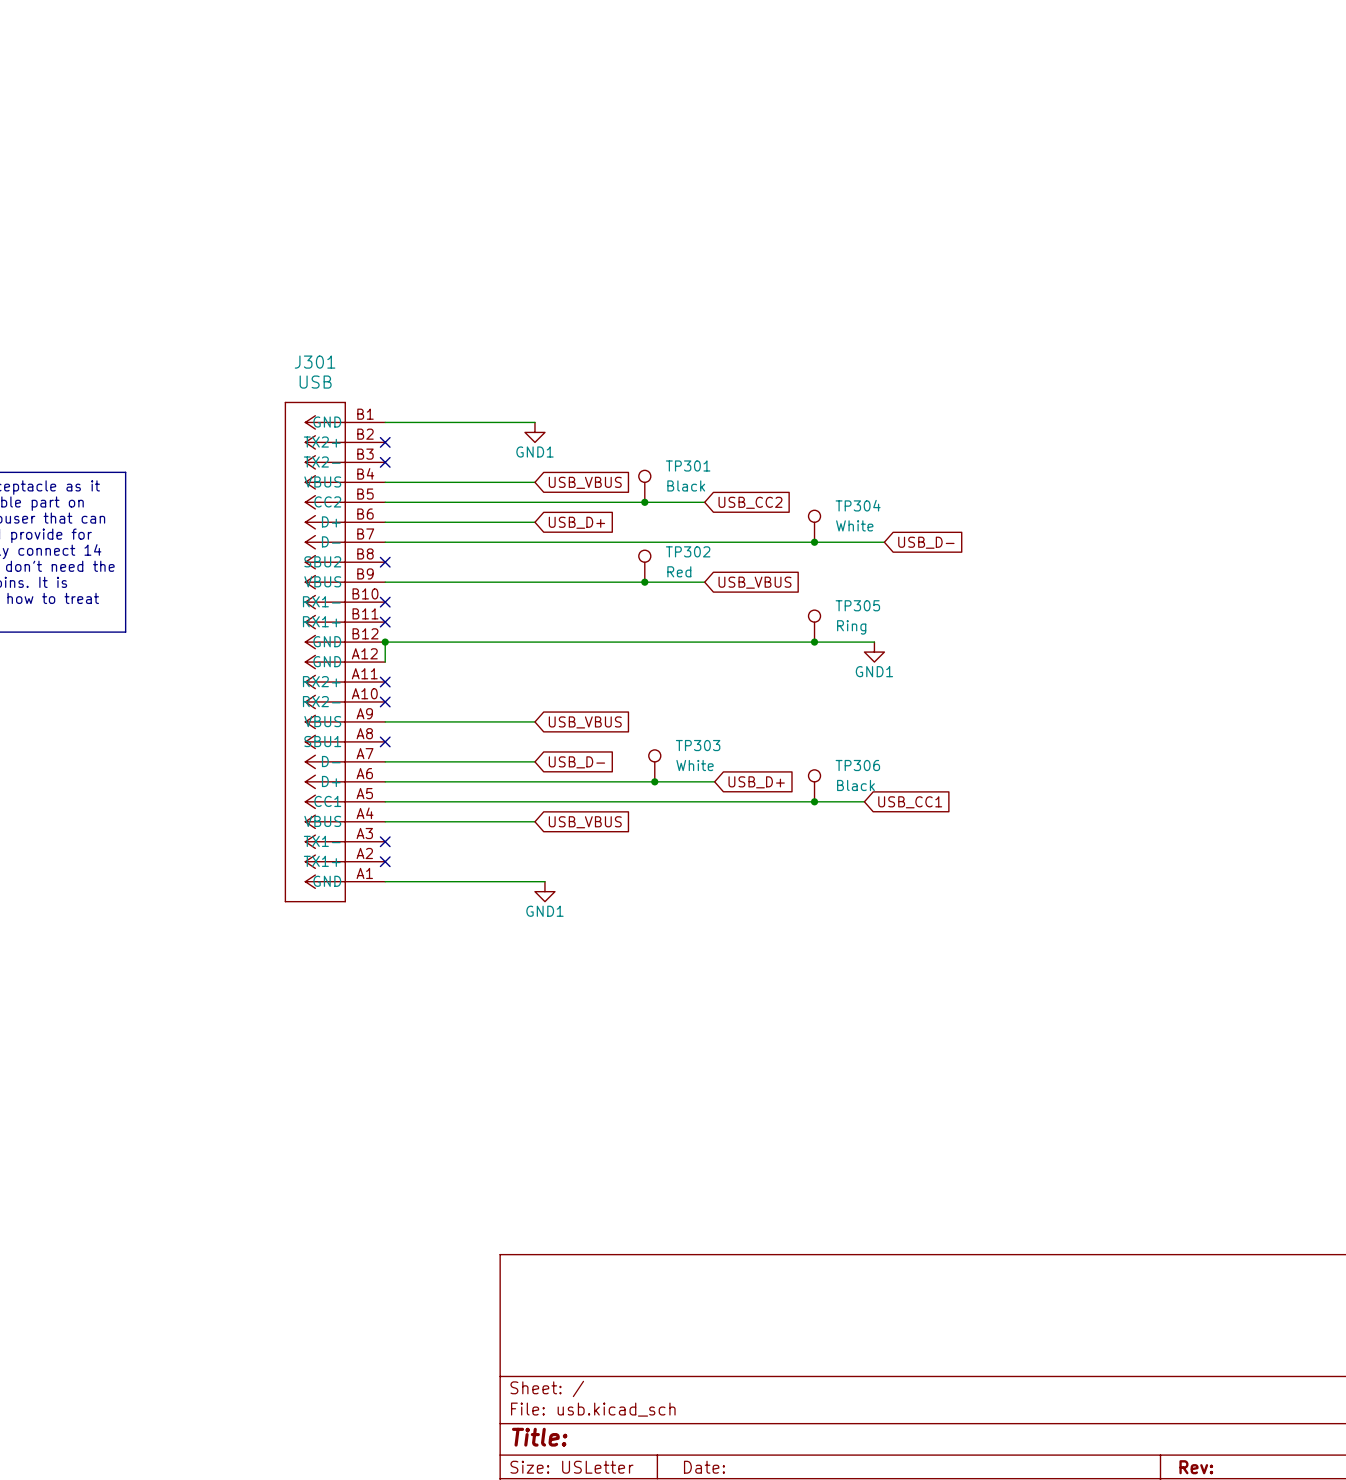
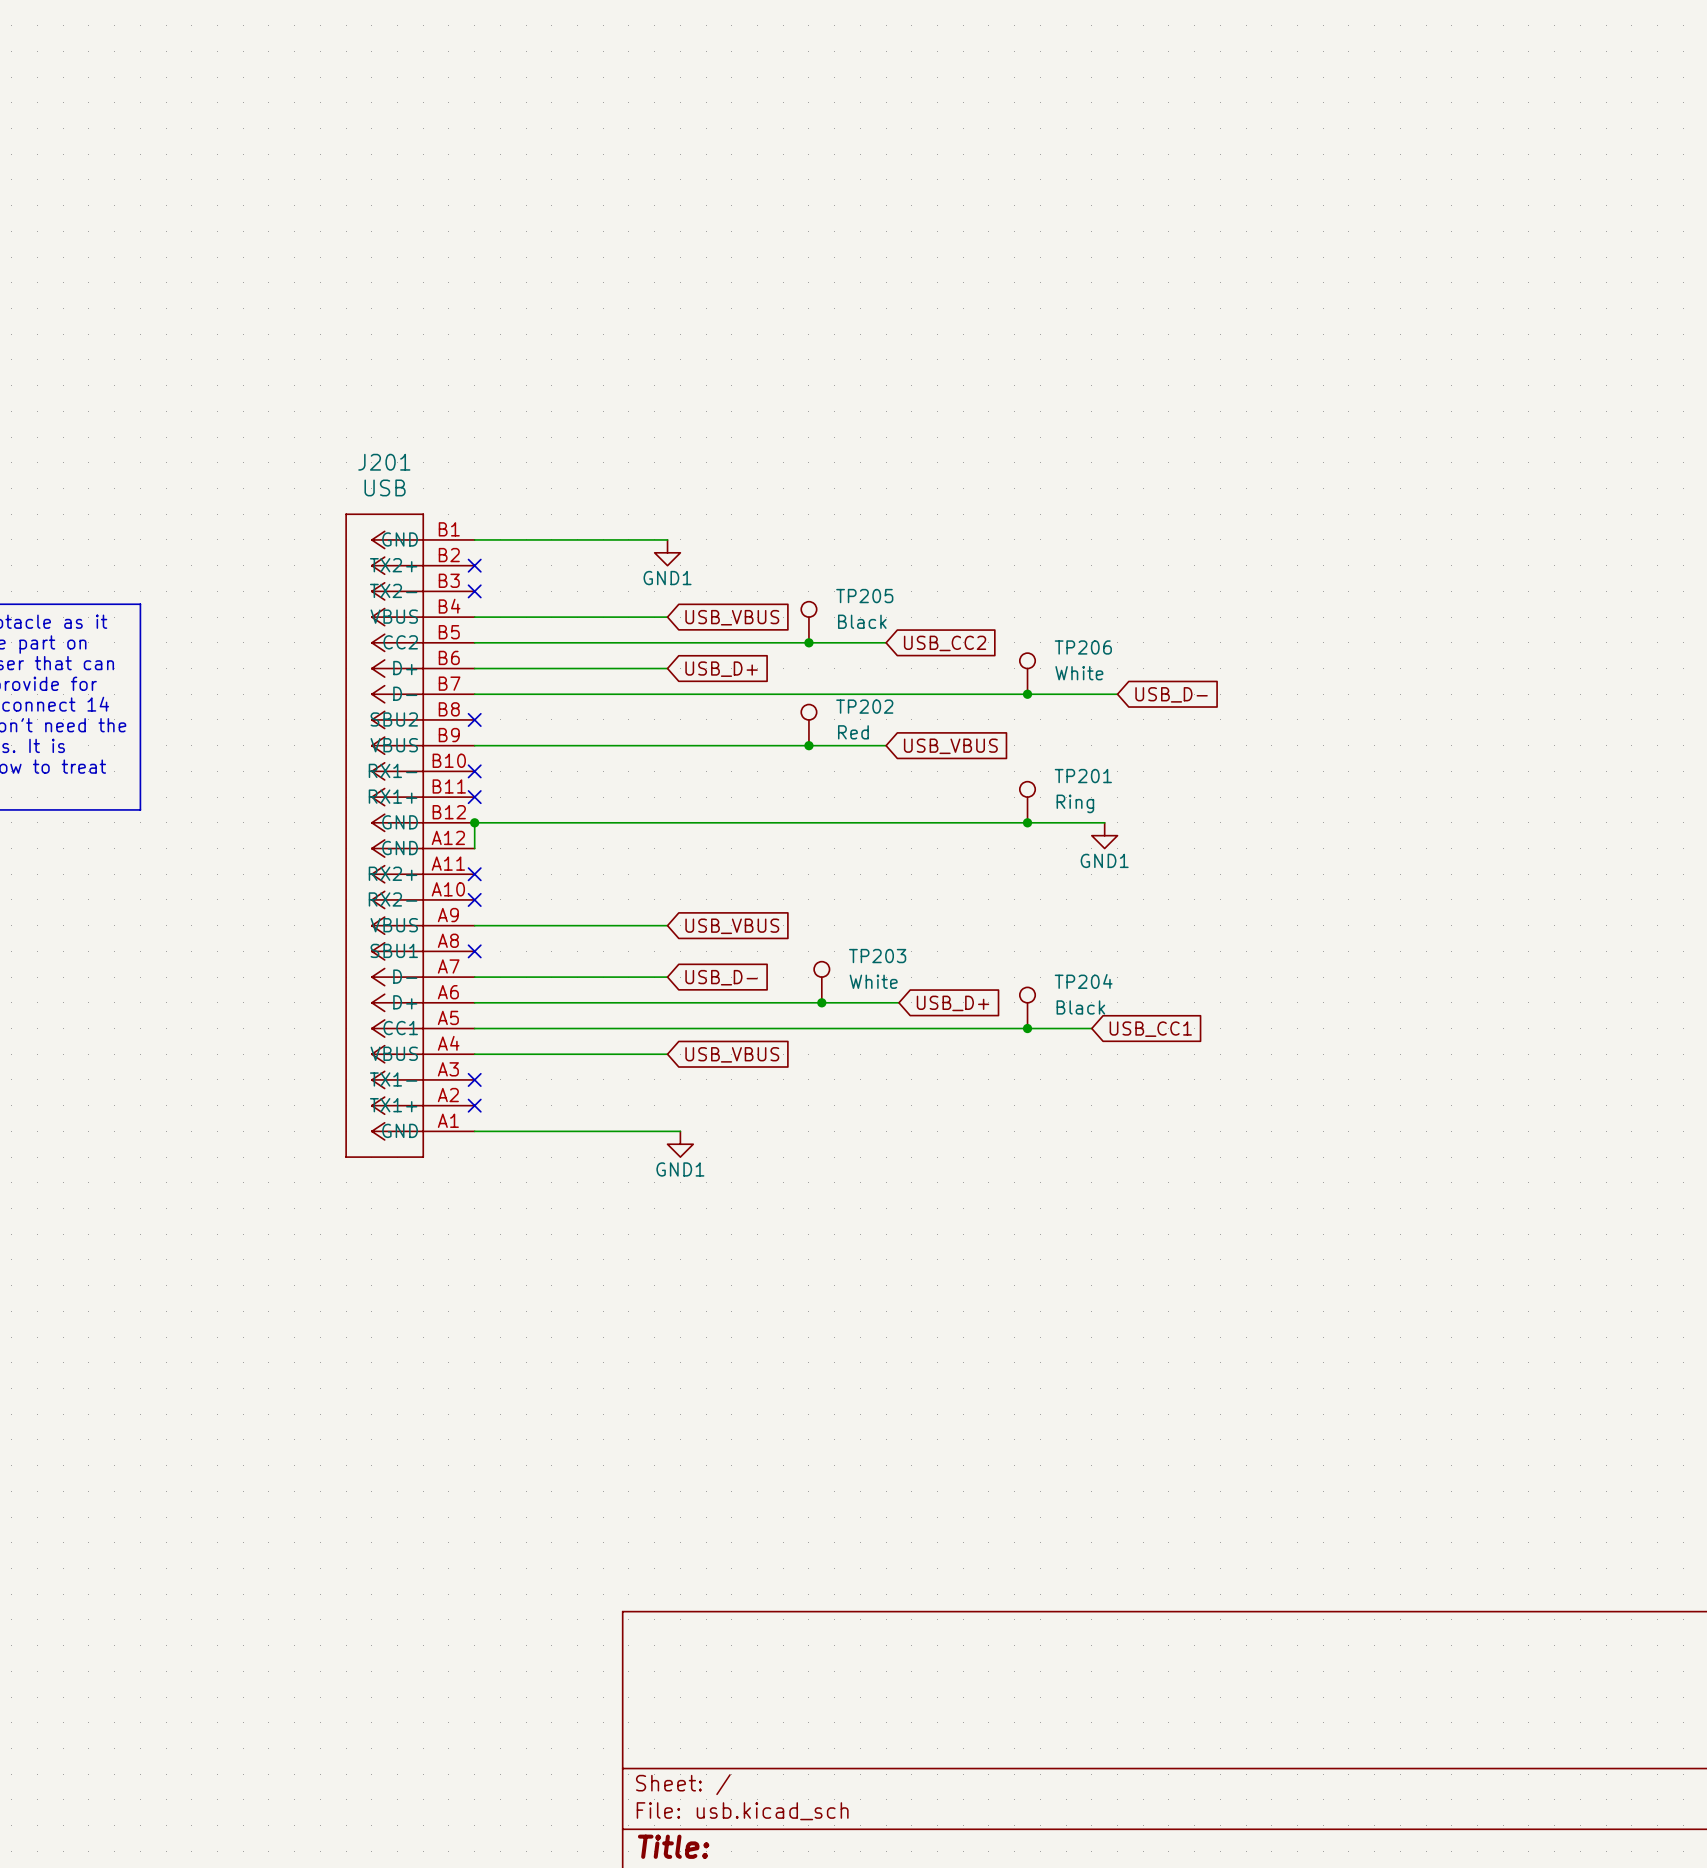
J301 name: J301 (315, 362) -> J201 (384, 462)
TP301 name: TP301 (688, 465) -> TP205 (864, 596)
TP304 name: TP304 (858, 505) -> TP206 (1083, 647)
TP302 name: TP302 (688, 551) -> TP202 (864, 706)
TP305 name: TP305 (857, 605) -> TP201 (1083, 776)
TP303 name: TP303 (698, 745) -> TP203 (877, 956)
TP306 name: TP306 (857, 765) -> TP204 (1083, 981)

